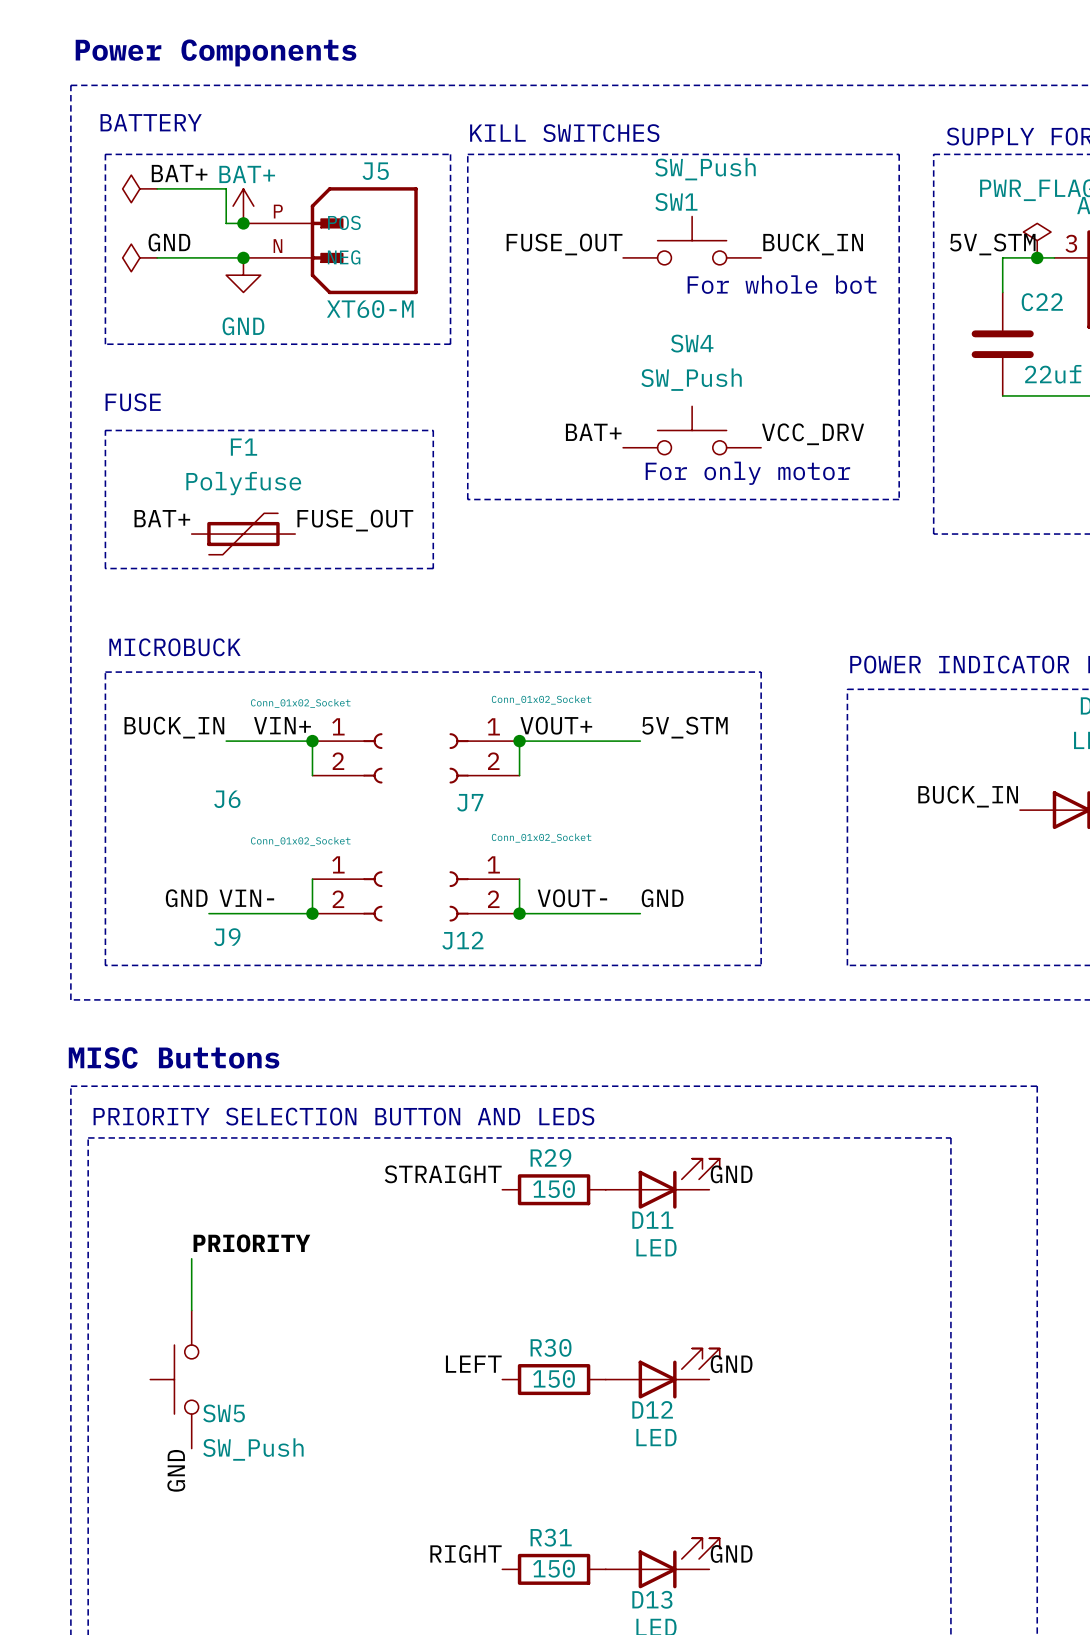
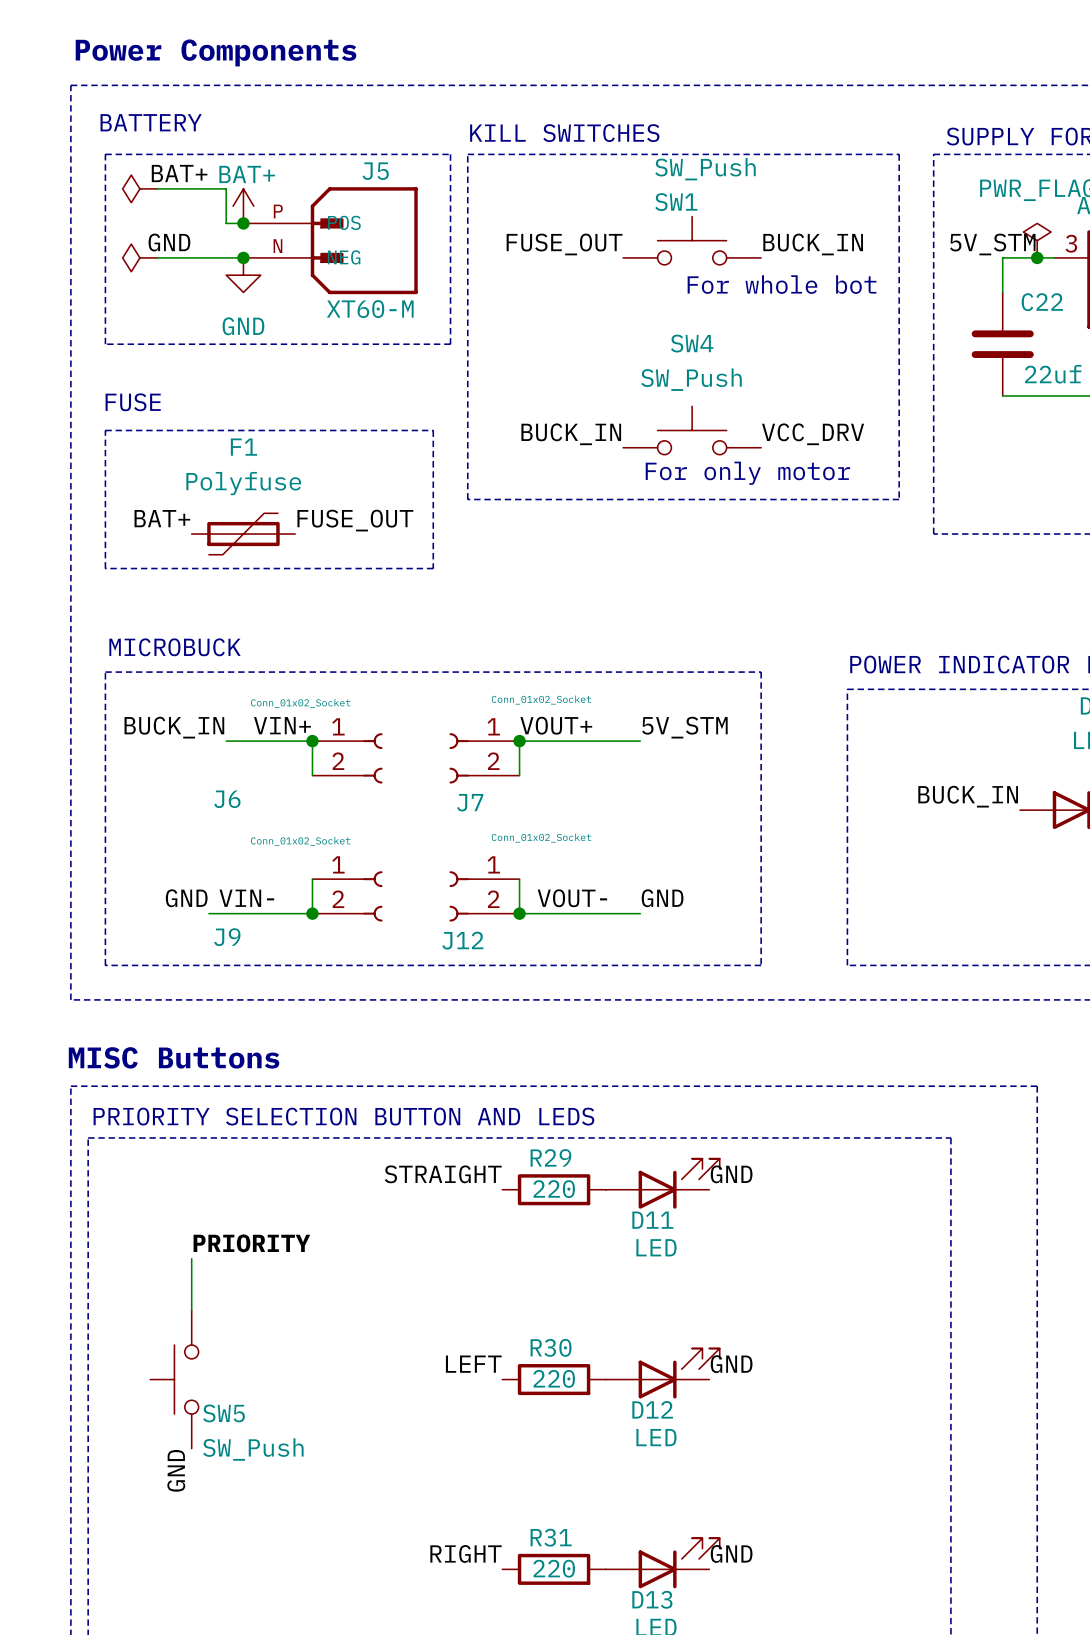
label: BAT+ (593, 432) -> BUCK_IN (571, 434)
R29 value: 150 (554, 1189) -> 220 (554, 1189)
R30 value: 150 (554, 1378) -> 220 (554, 1378)
R31 value: 150 (554, 1568) -> 220 (554, 1568)

